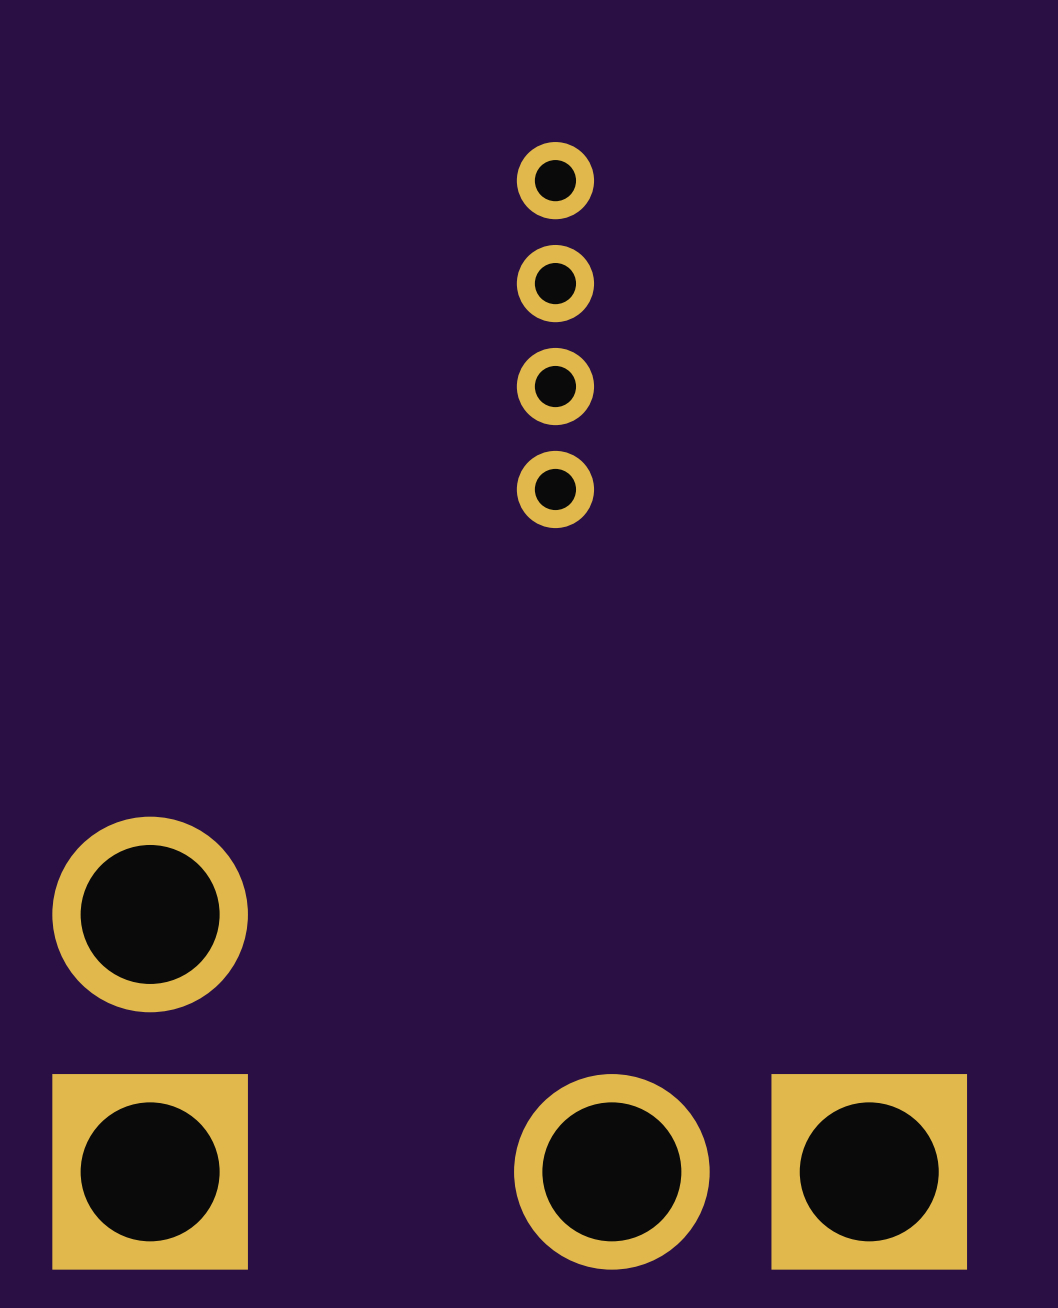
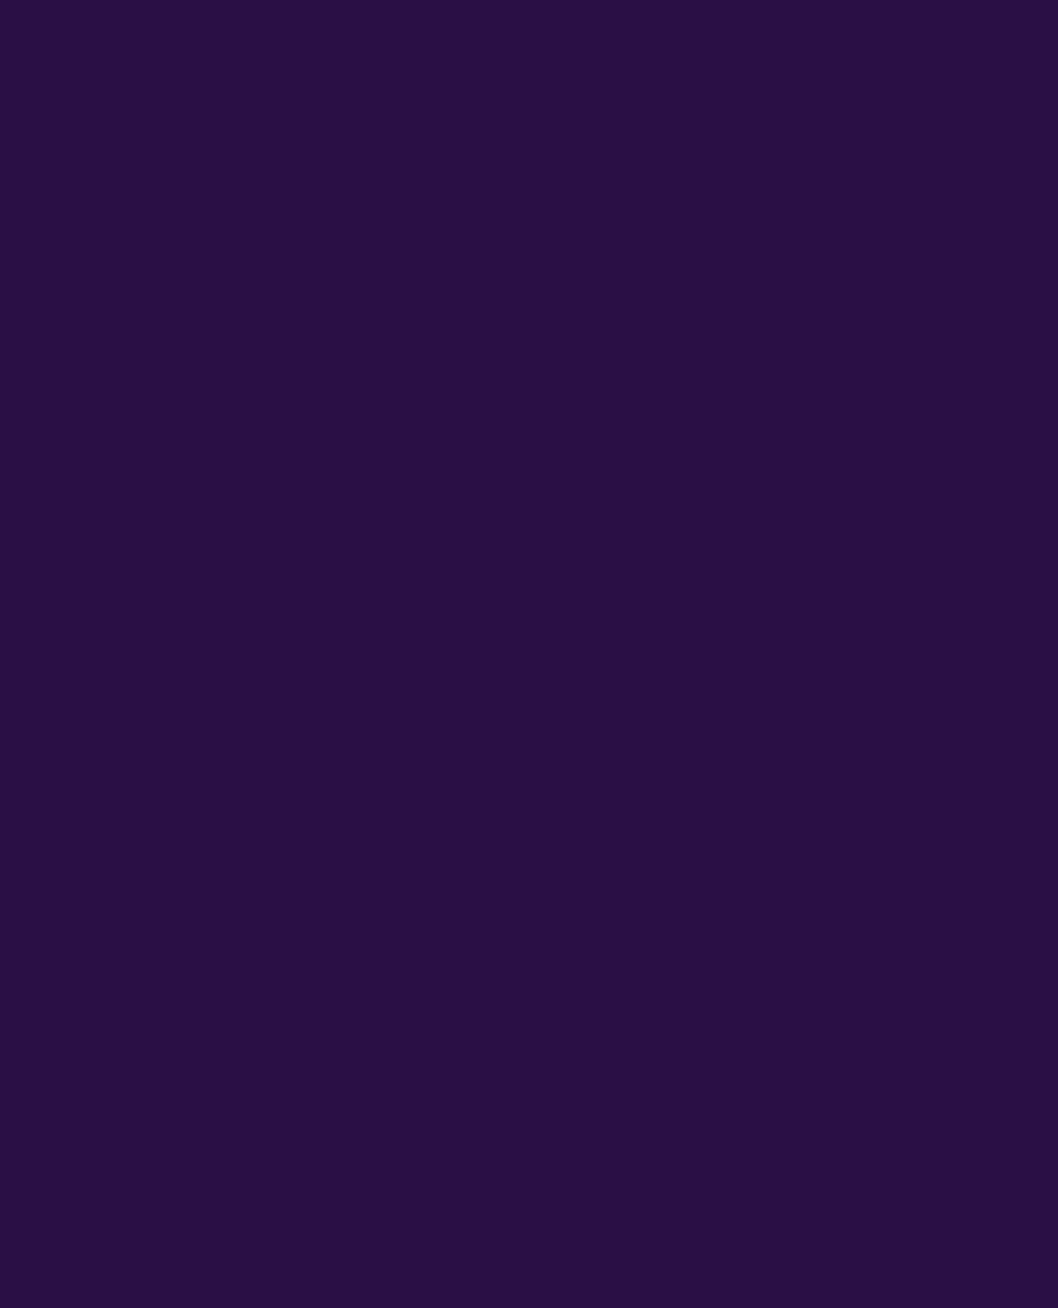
part: (555, 335) -> none
part: (150, 1043) -> none
part: (740, 1171) -> none

